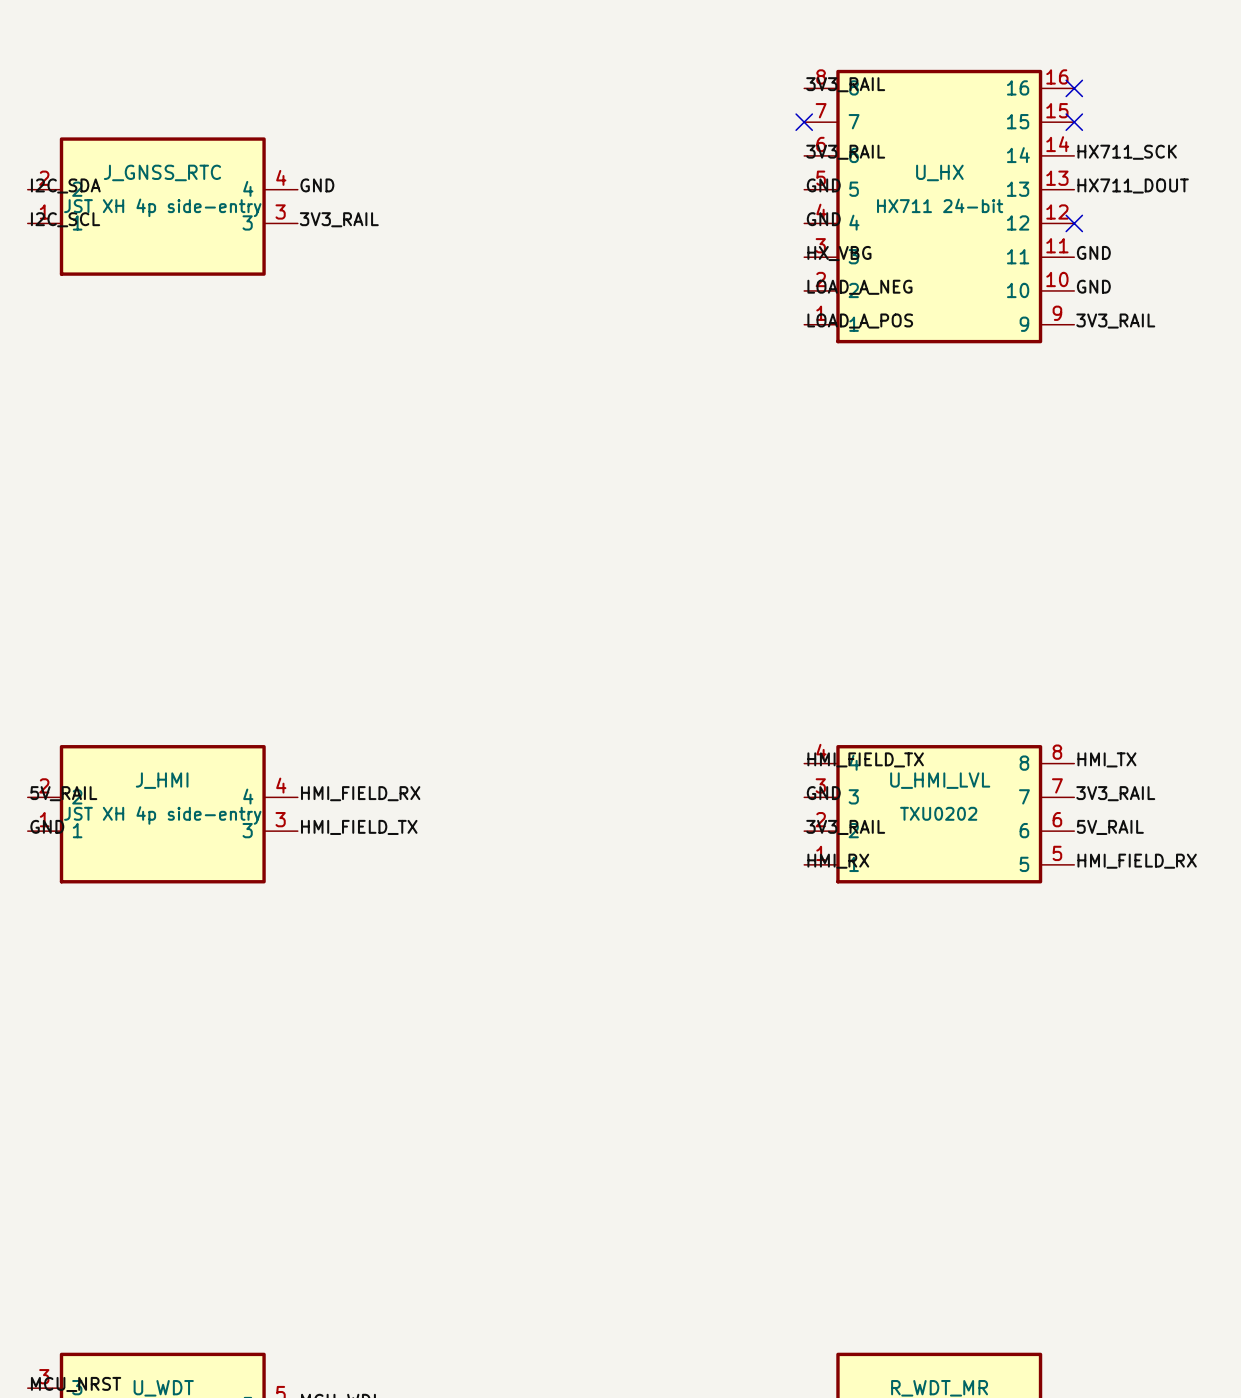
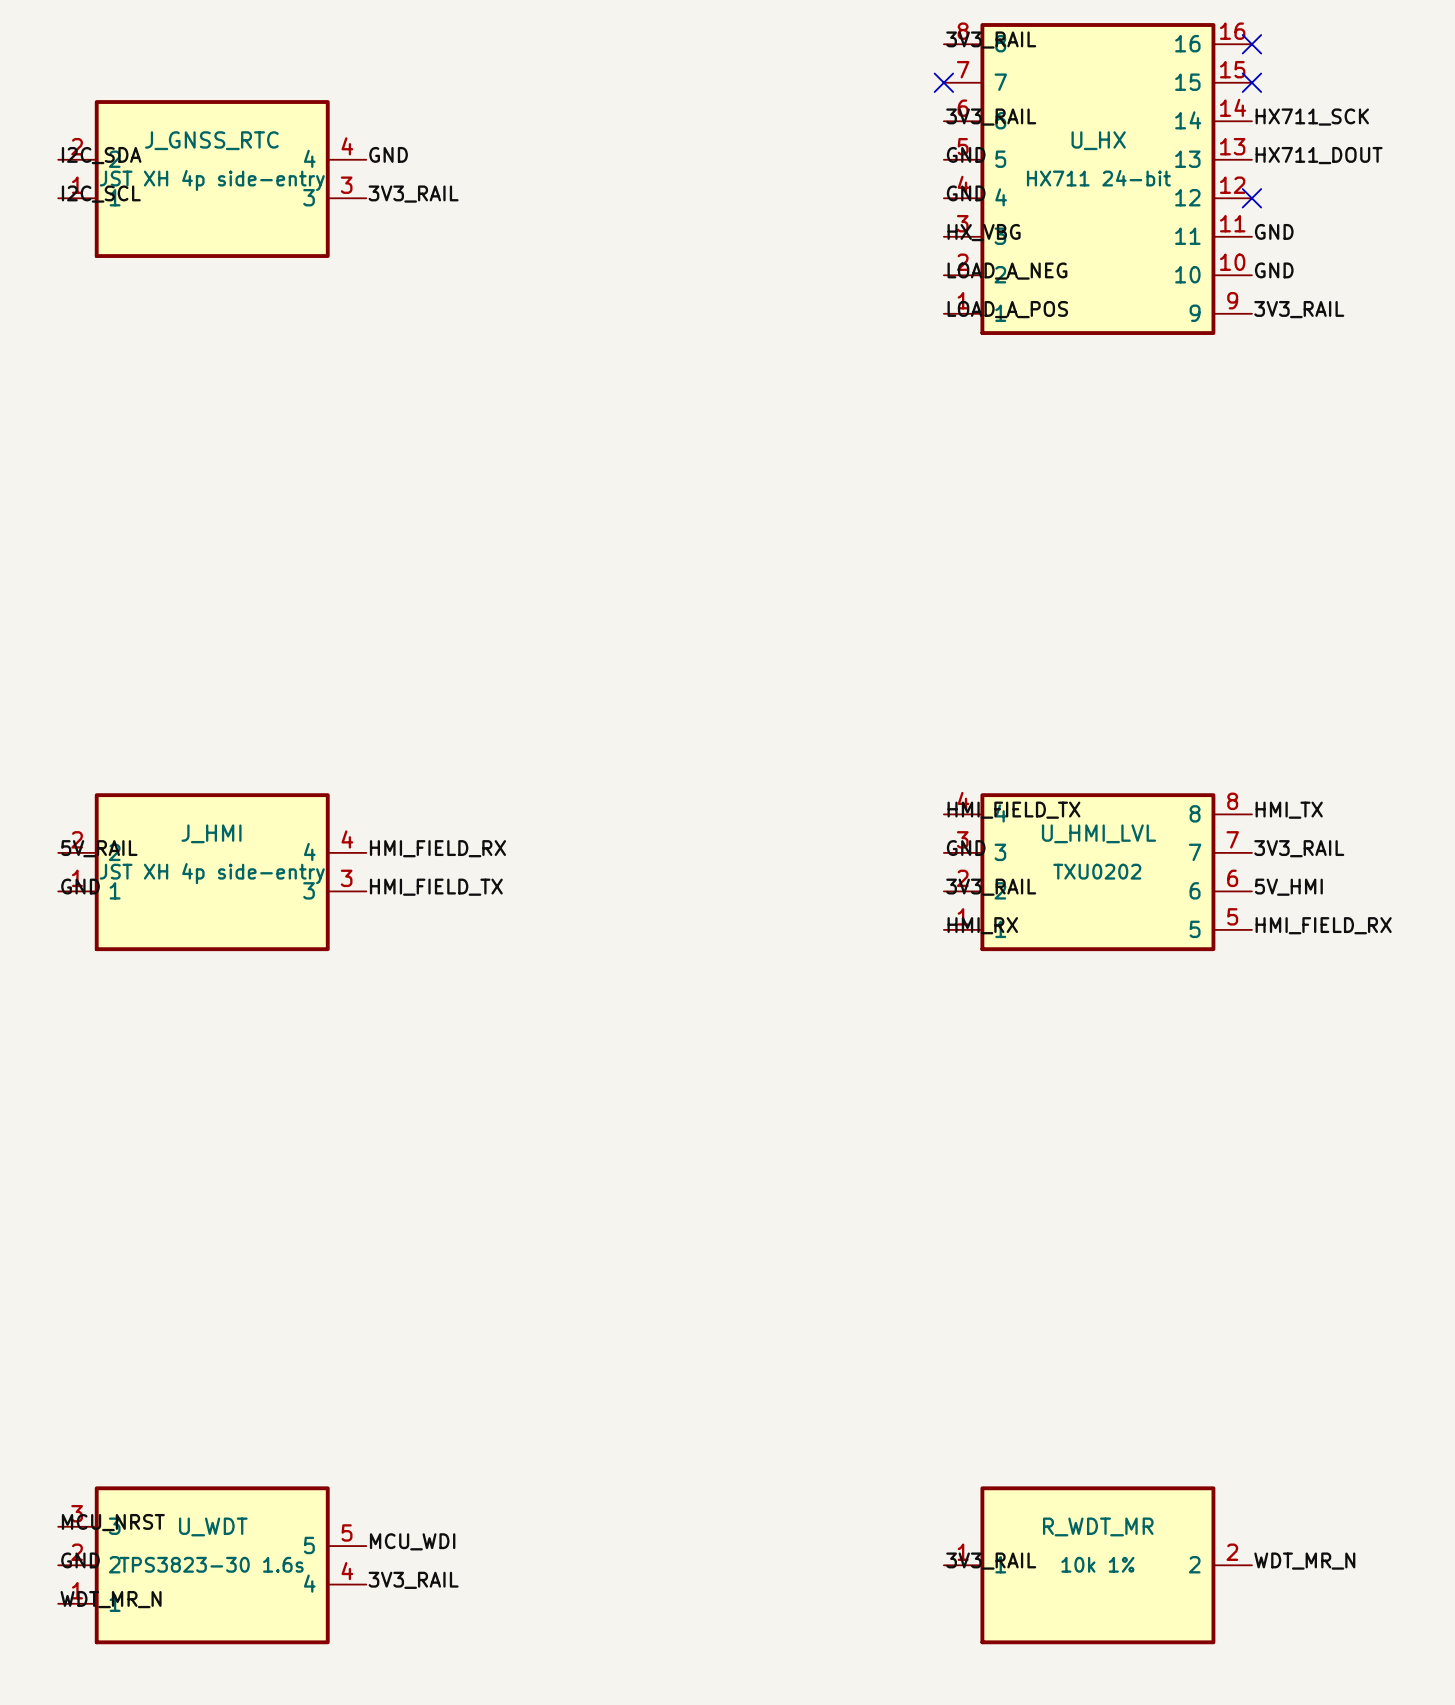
label: 5V_RAIL (1110, 827) -> 5V_HMI (1288, 887)

